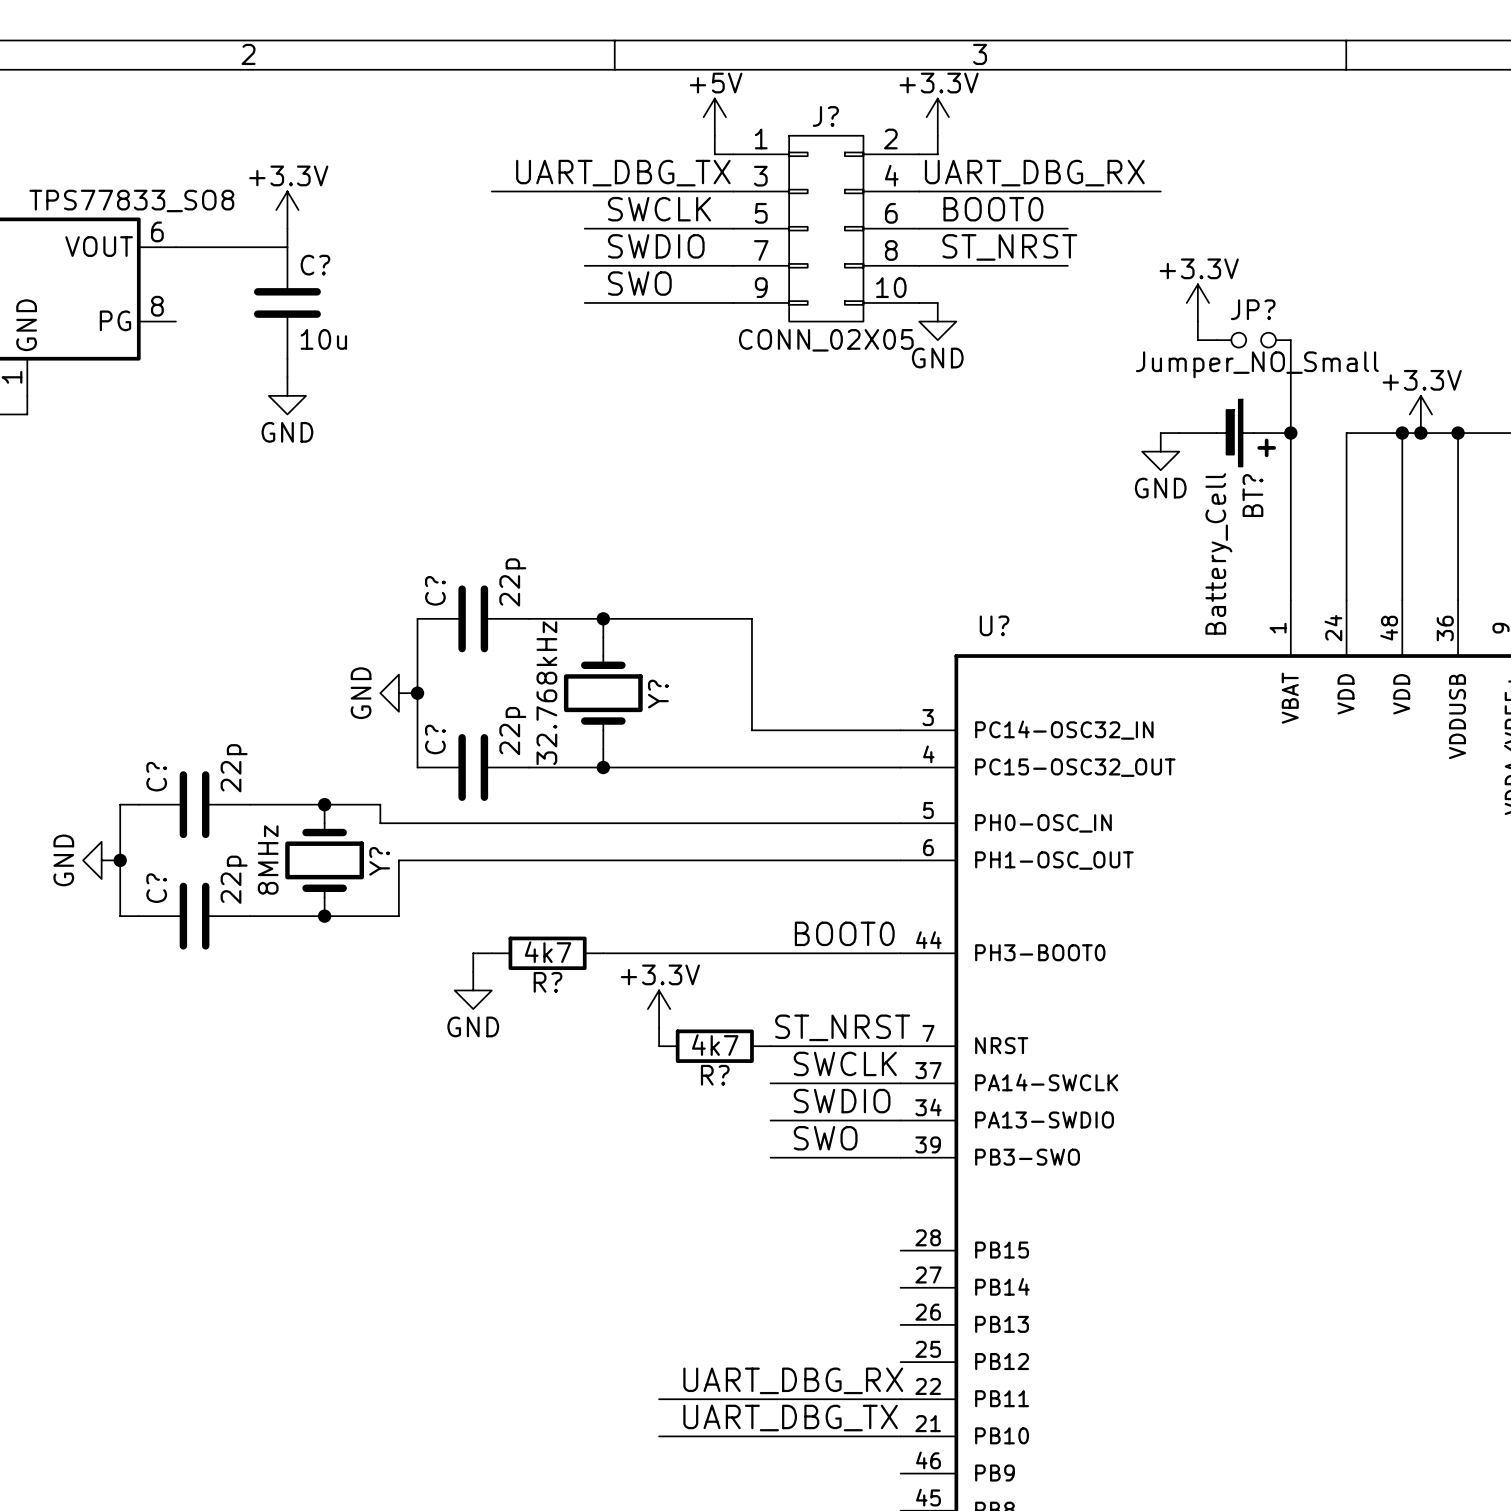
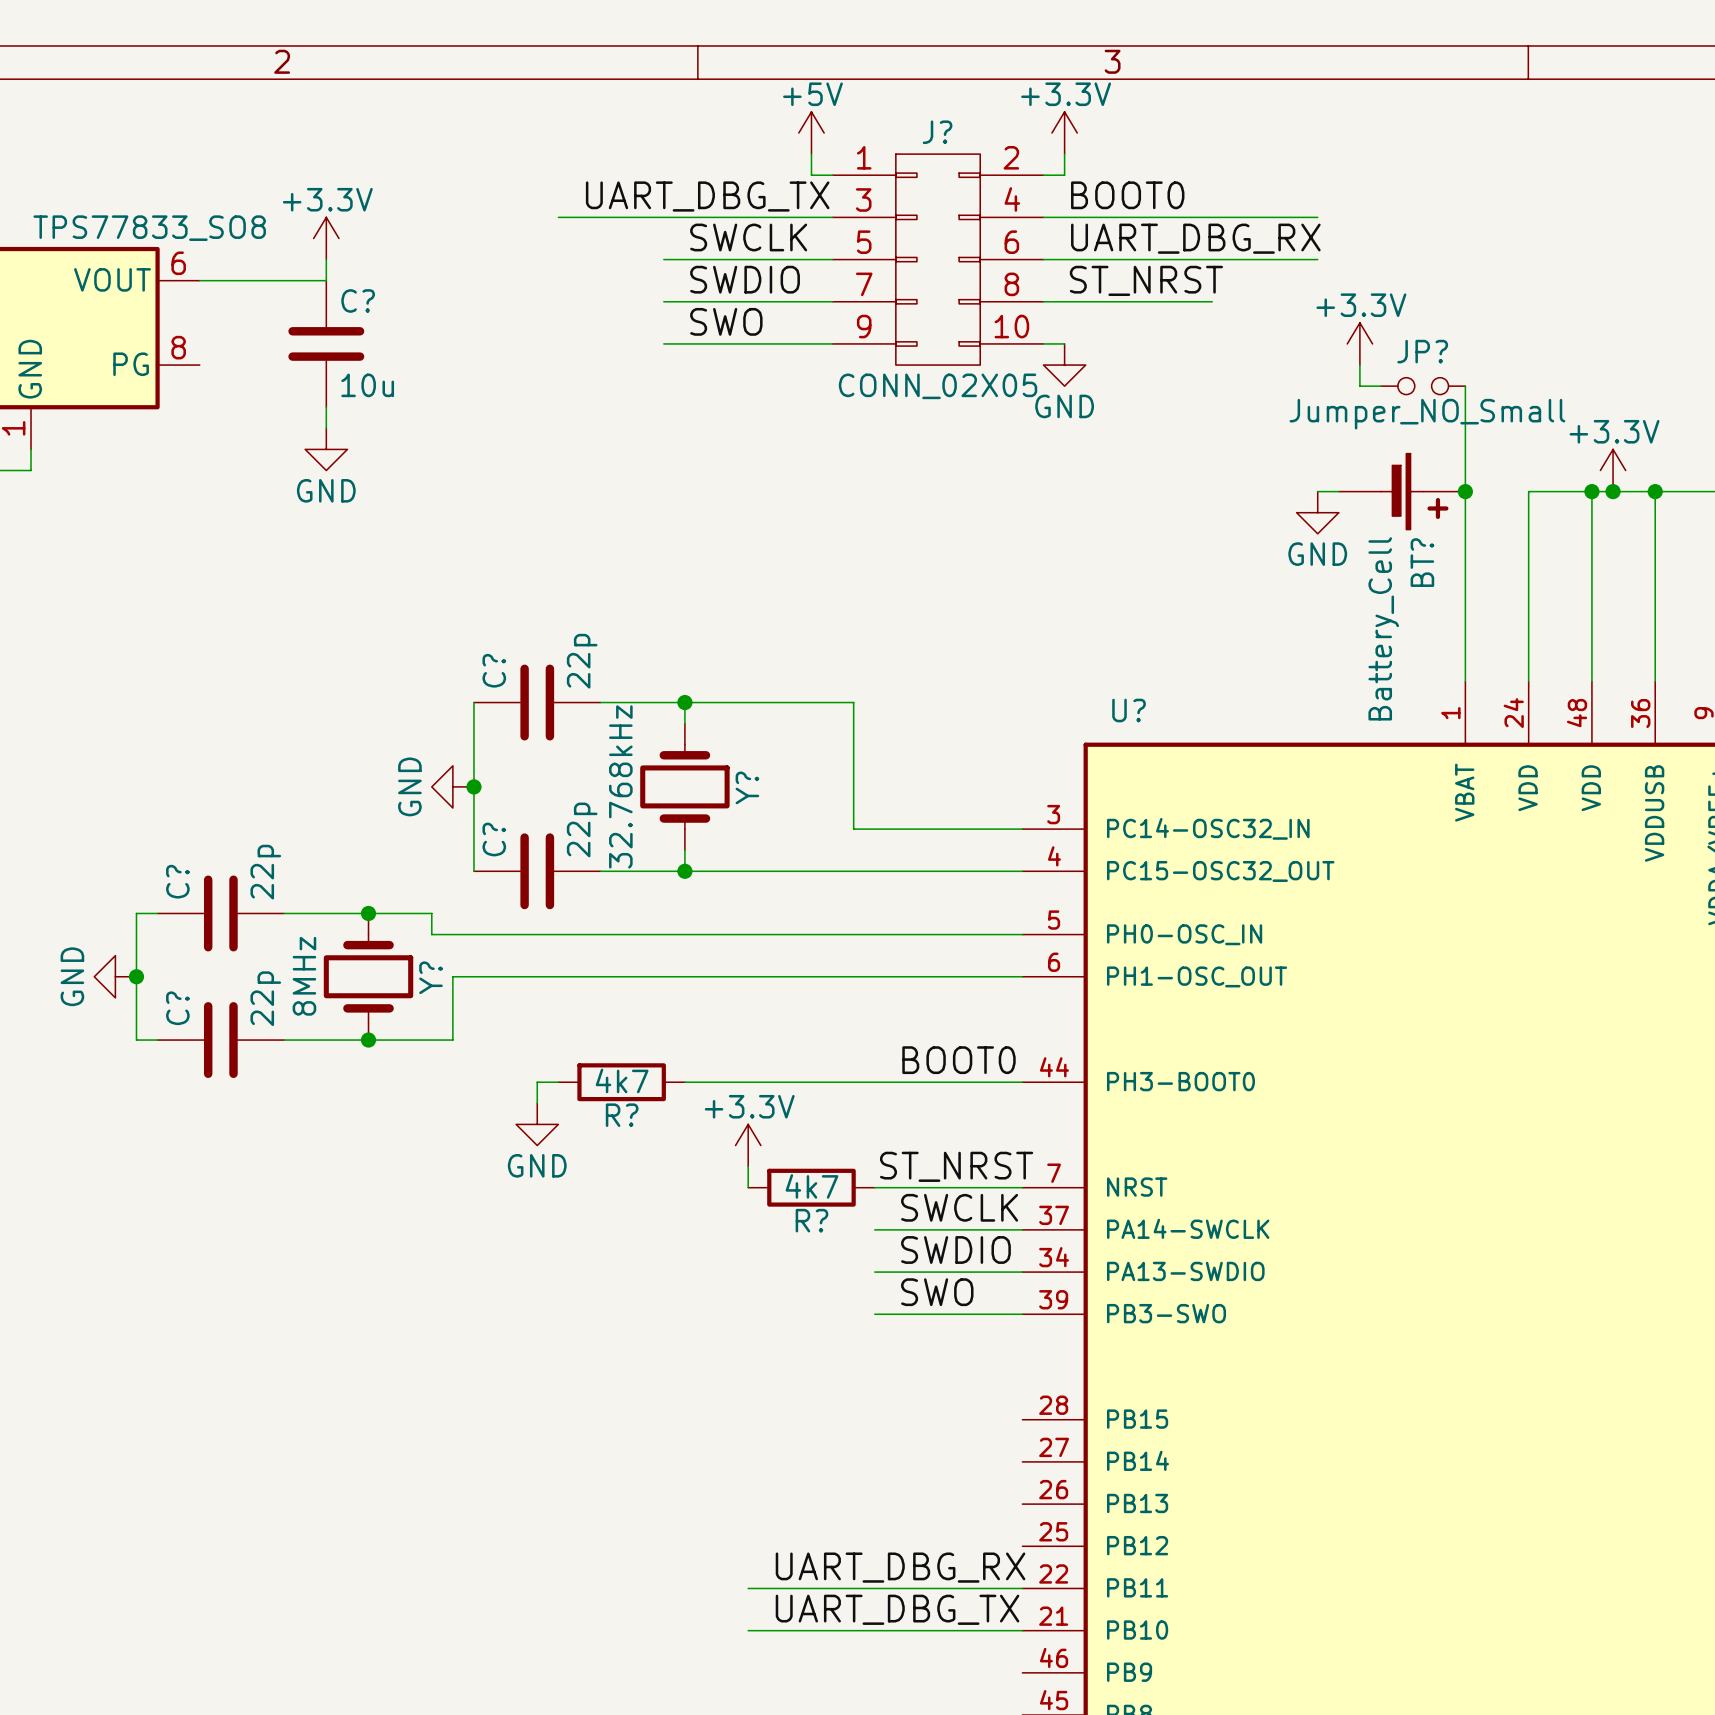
label: none -> BOOT0 (1127, 195)
label: UART_DBG_RX (1034, 173) -> none
label: BOOT0 (993, 209) -> UART_DBG_RX (1195, 238)
wire: none -> (1212, 259) (1317, 259)

